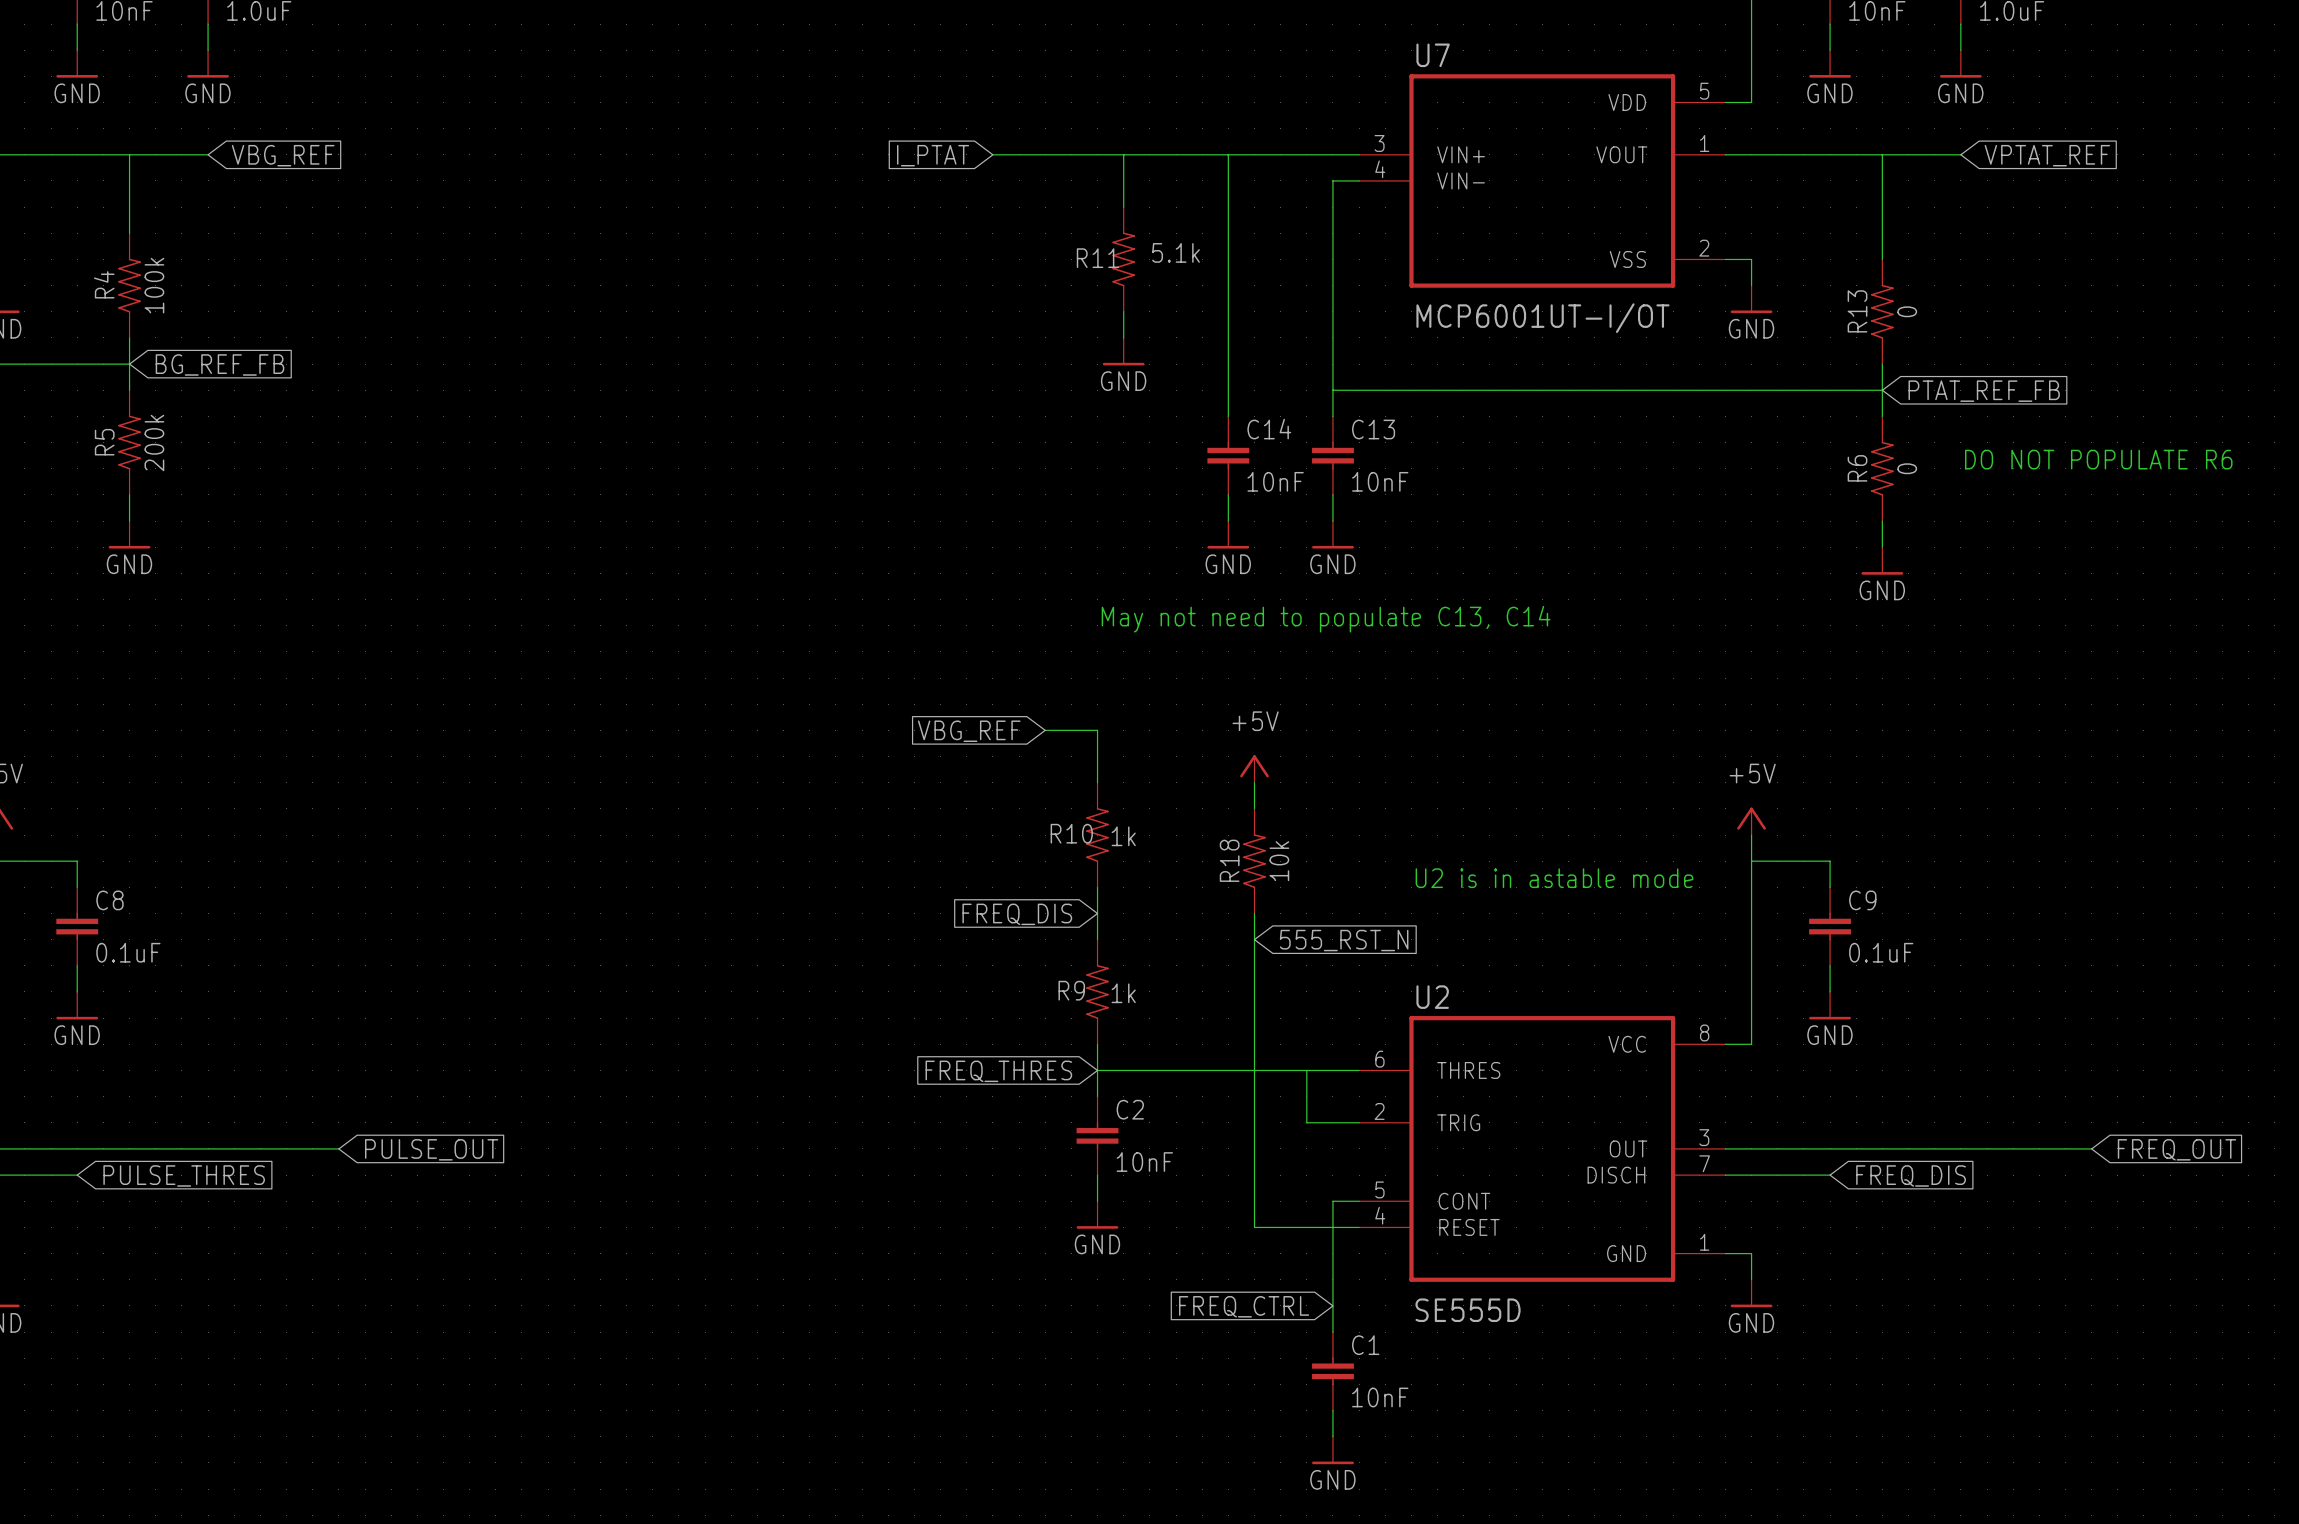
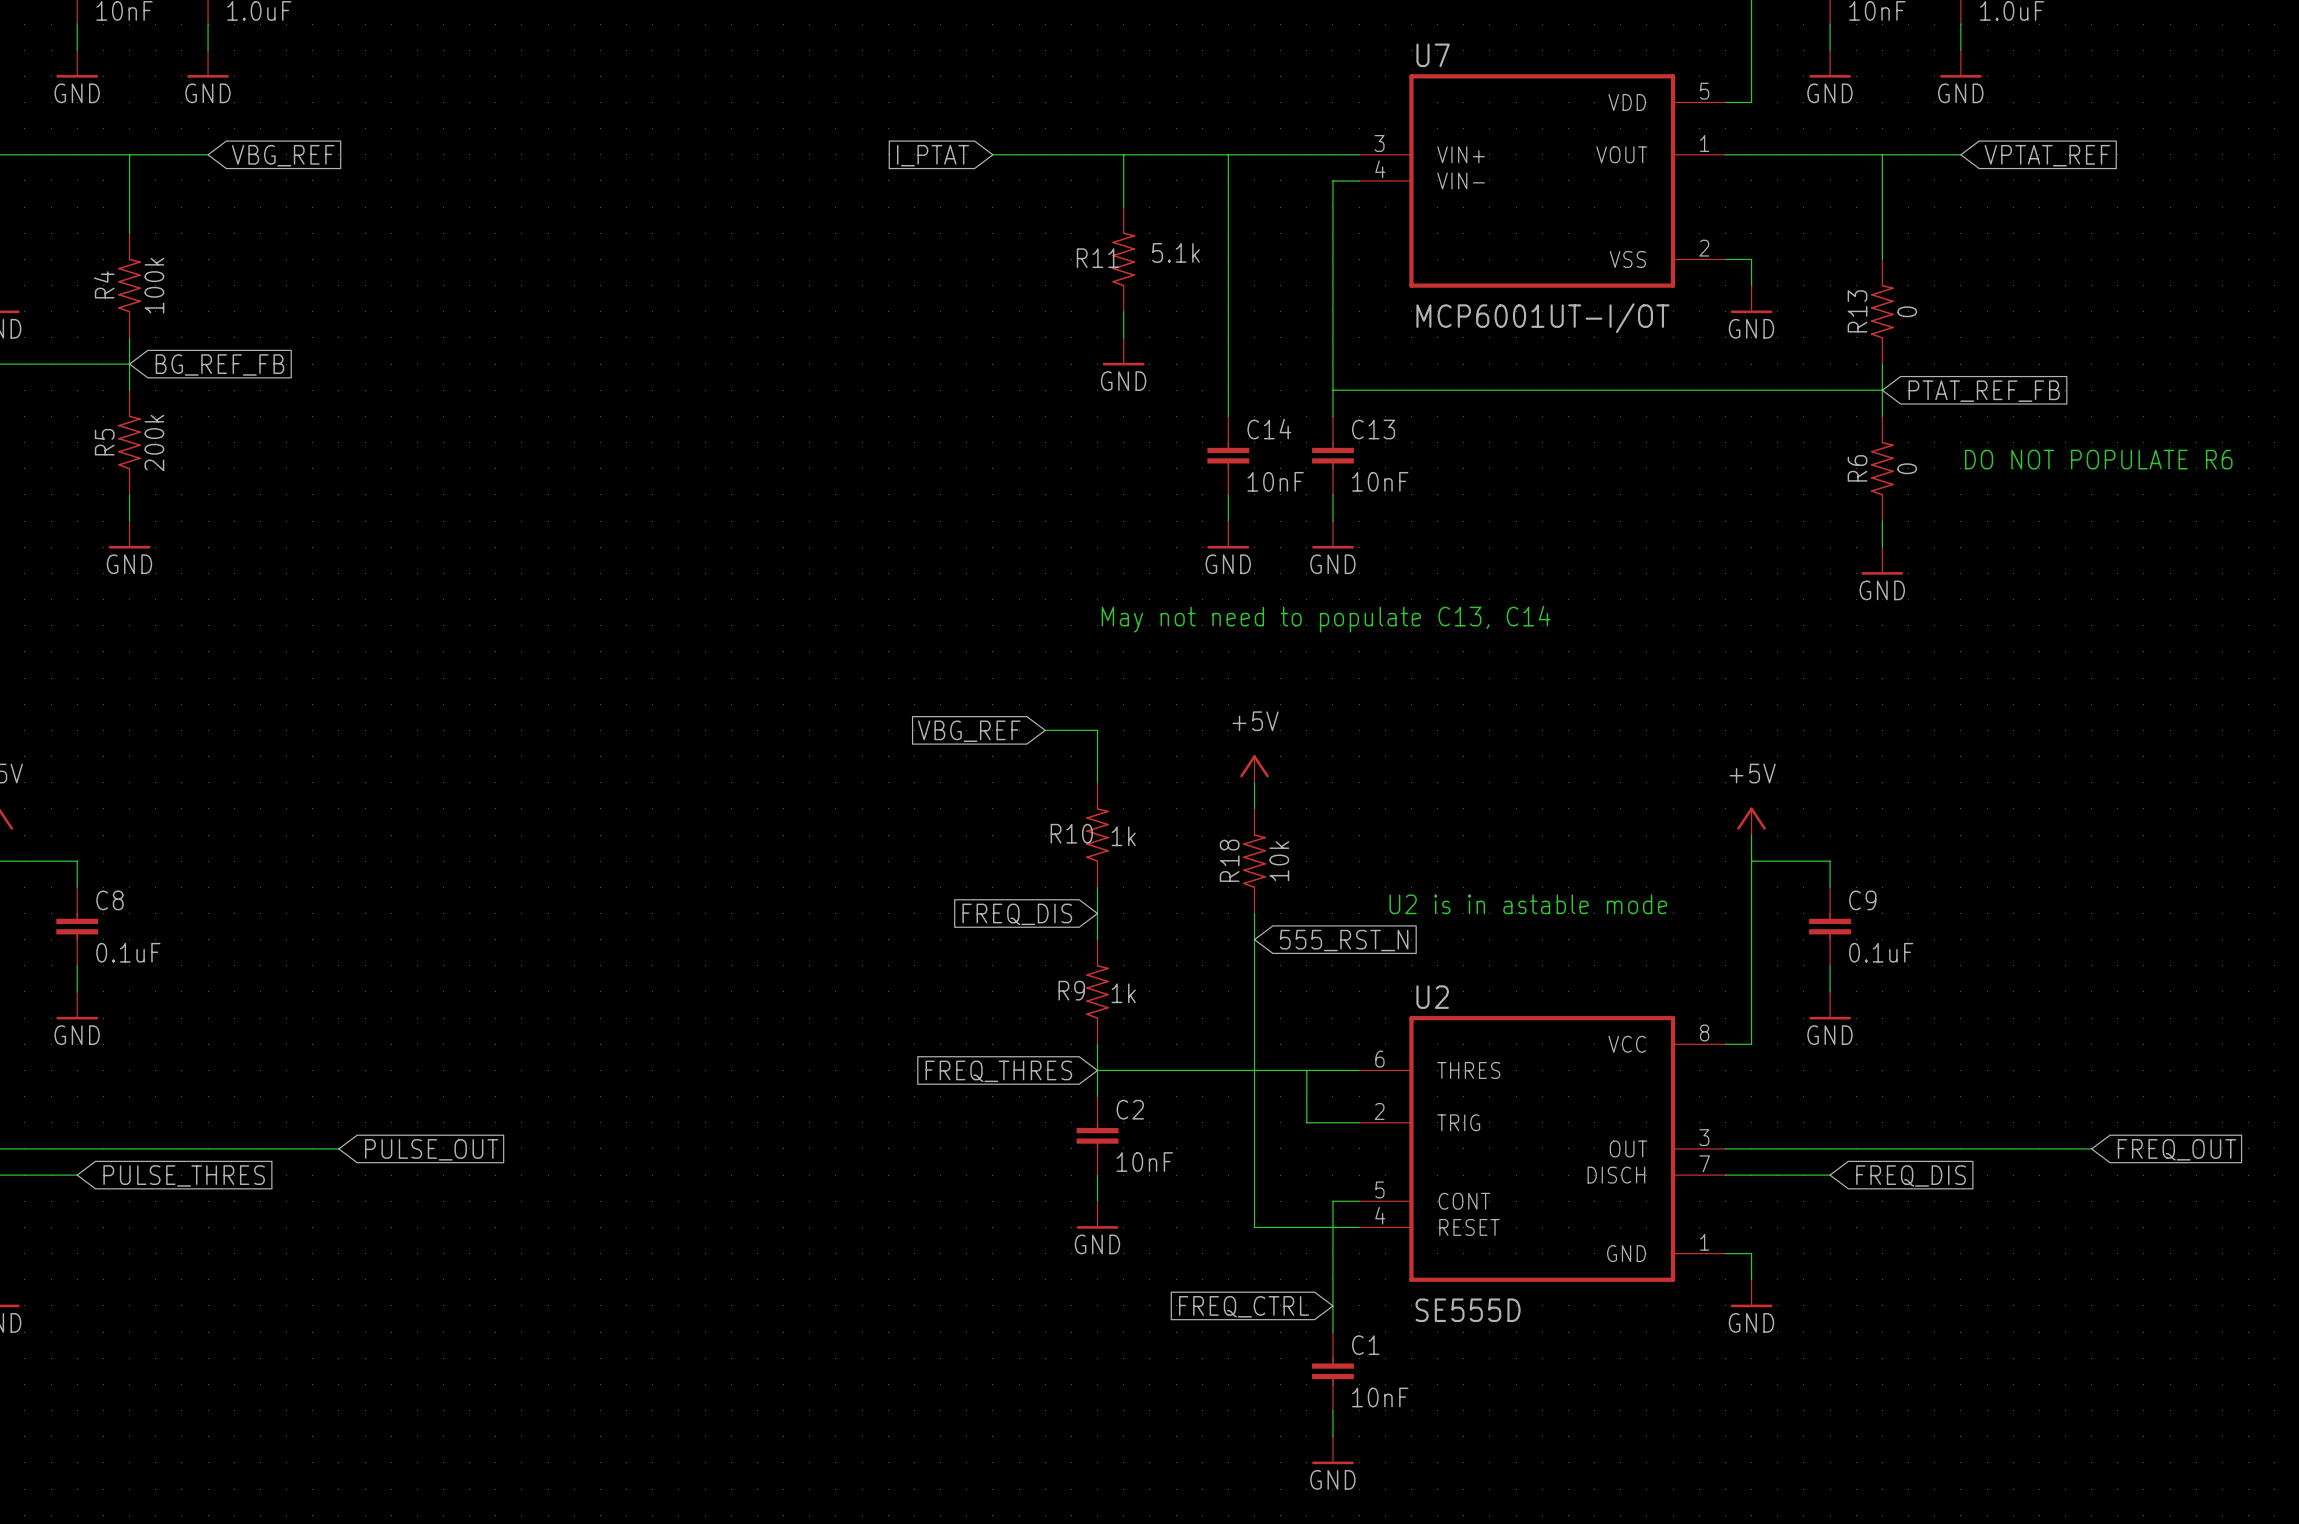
text position: U2 is in astable mode (1554, 878) -> U2 is in astable mode (1528, 904)

